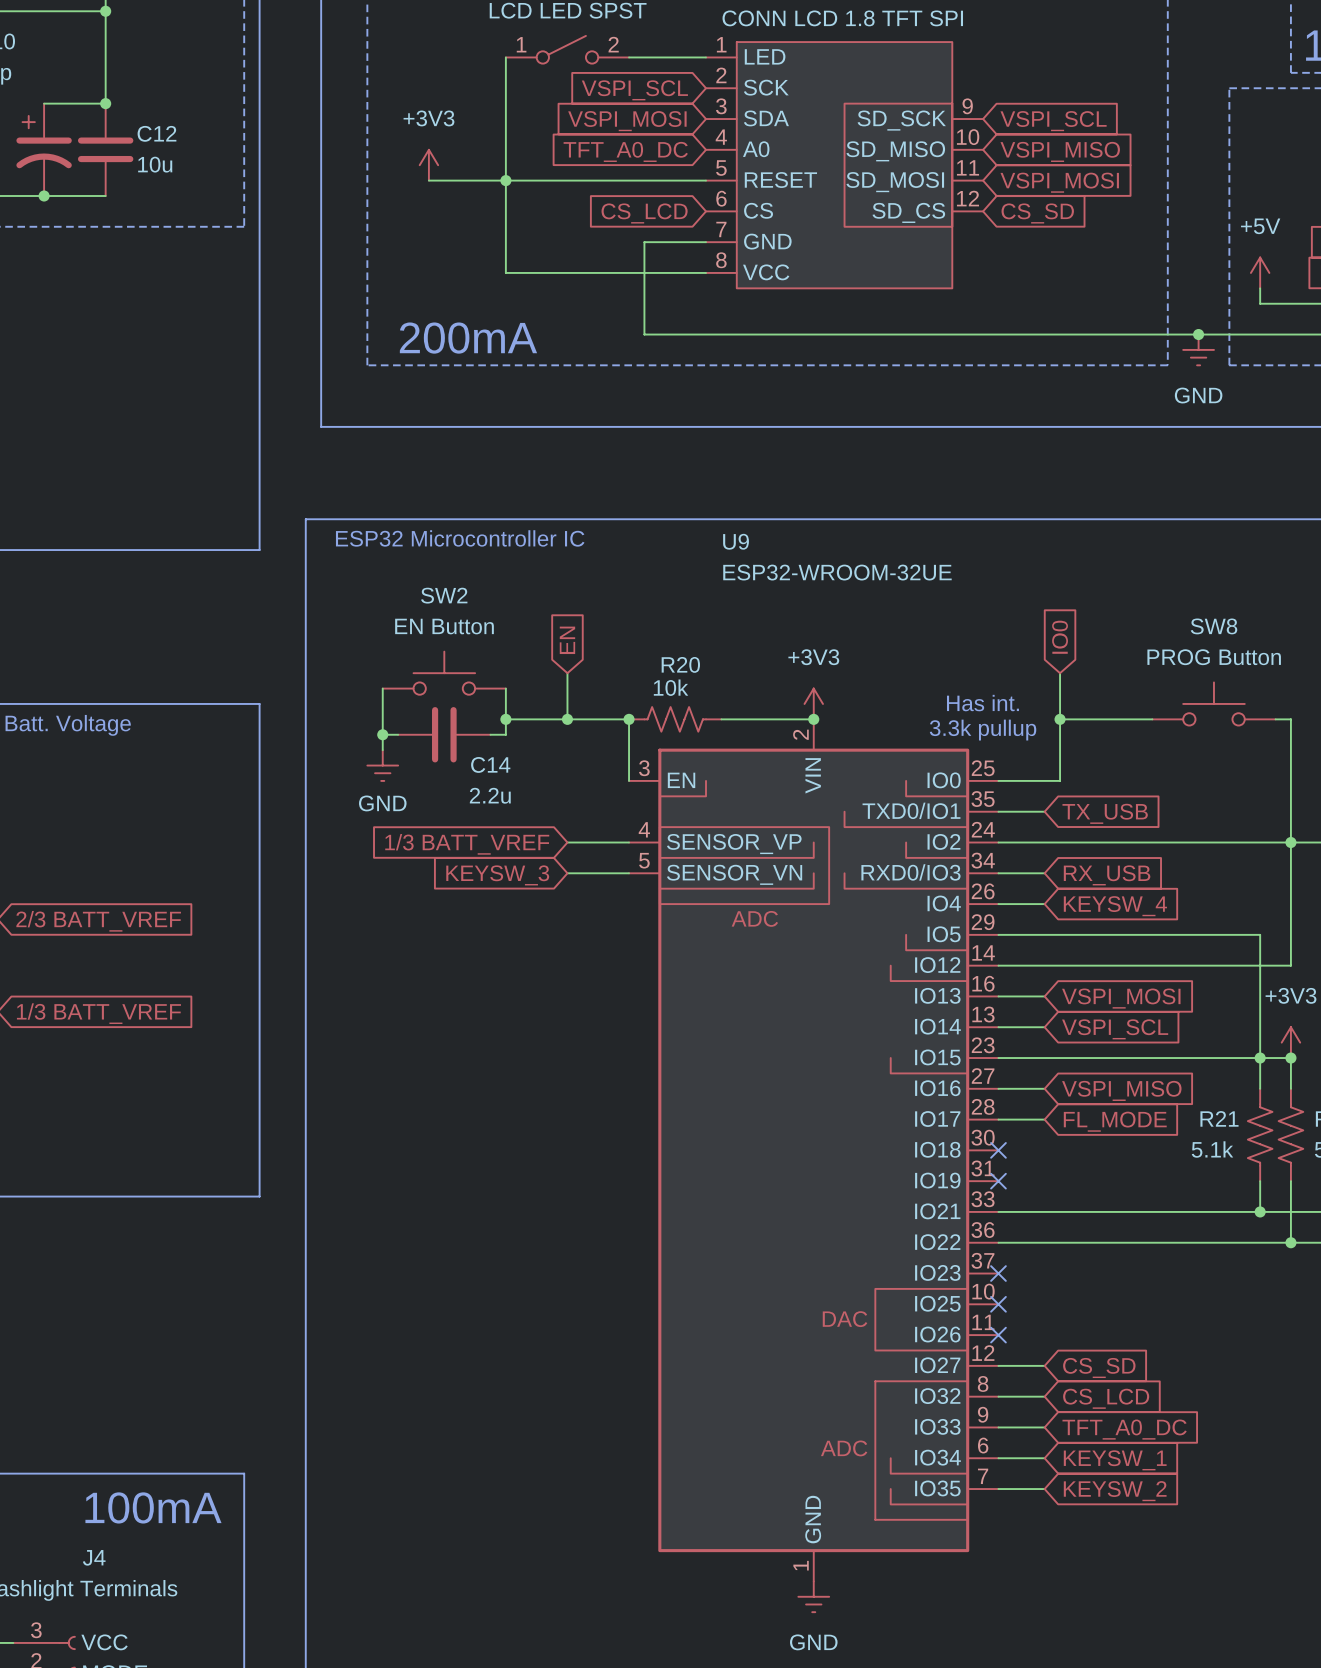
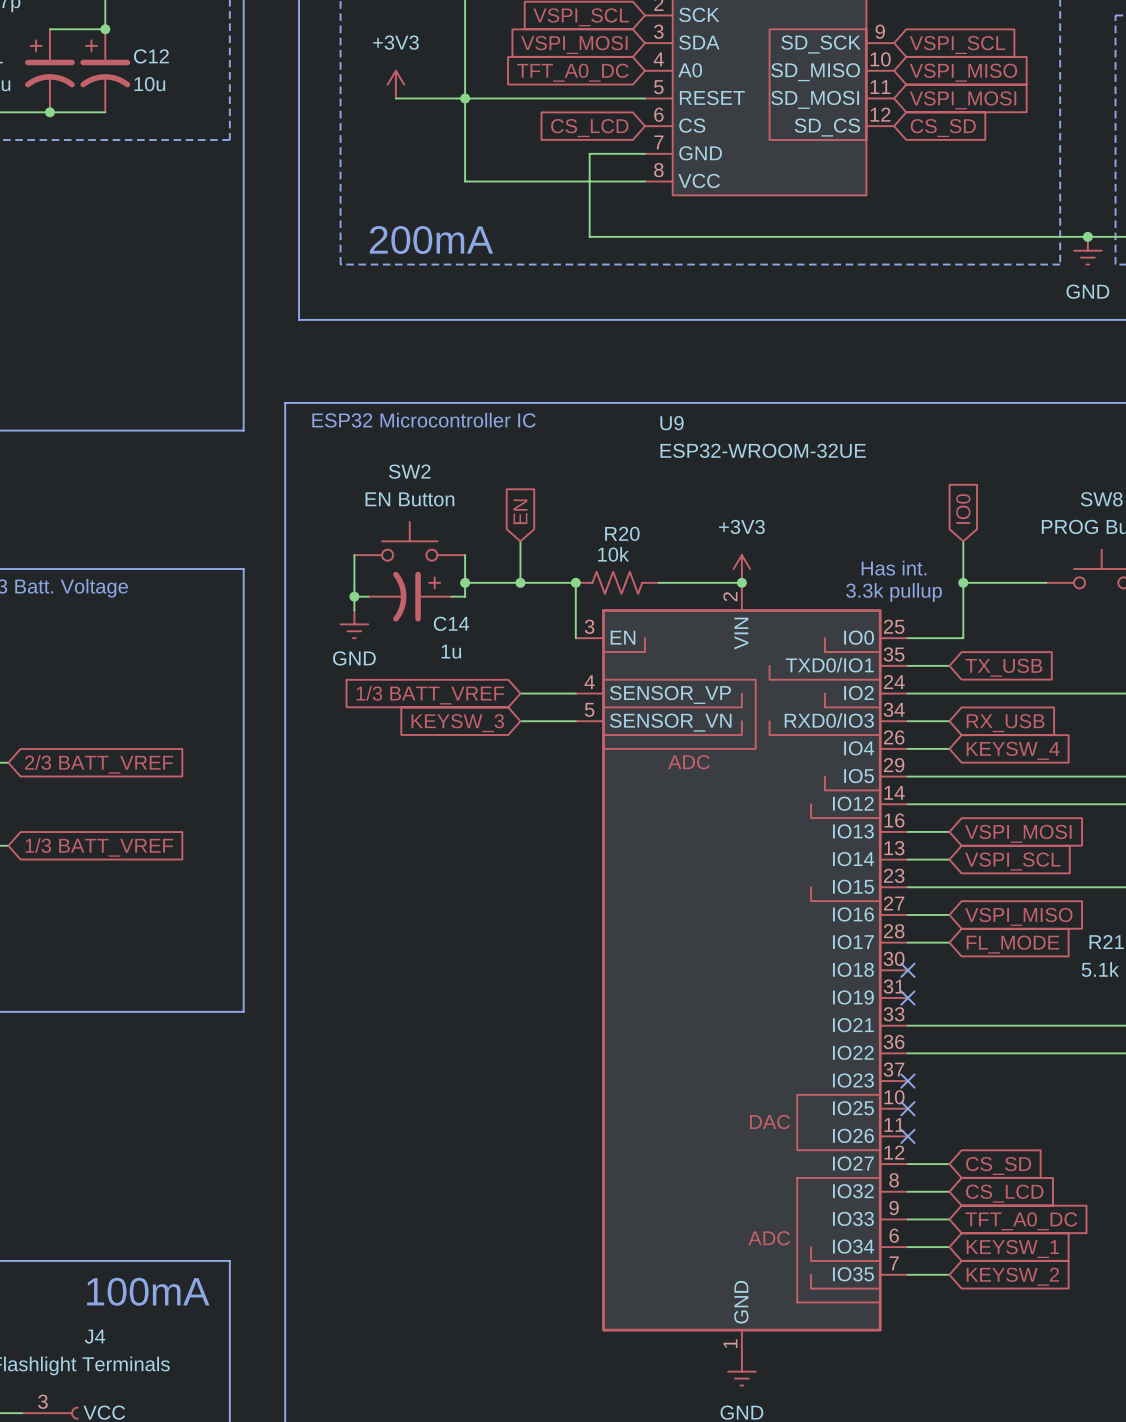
C12 symbol: [77, 103, 134, 196] -> [80, 29, 131, 113]
C14 symbol: [398, 707, 491, 763] -> [368, 571, 452, 622]
C14 value: 2.2u (490, 795) -> 1u (451, 651)

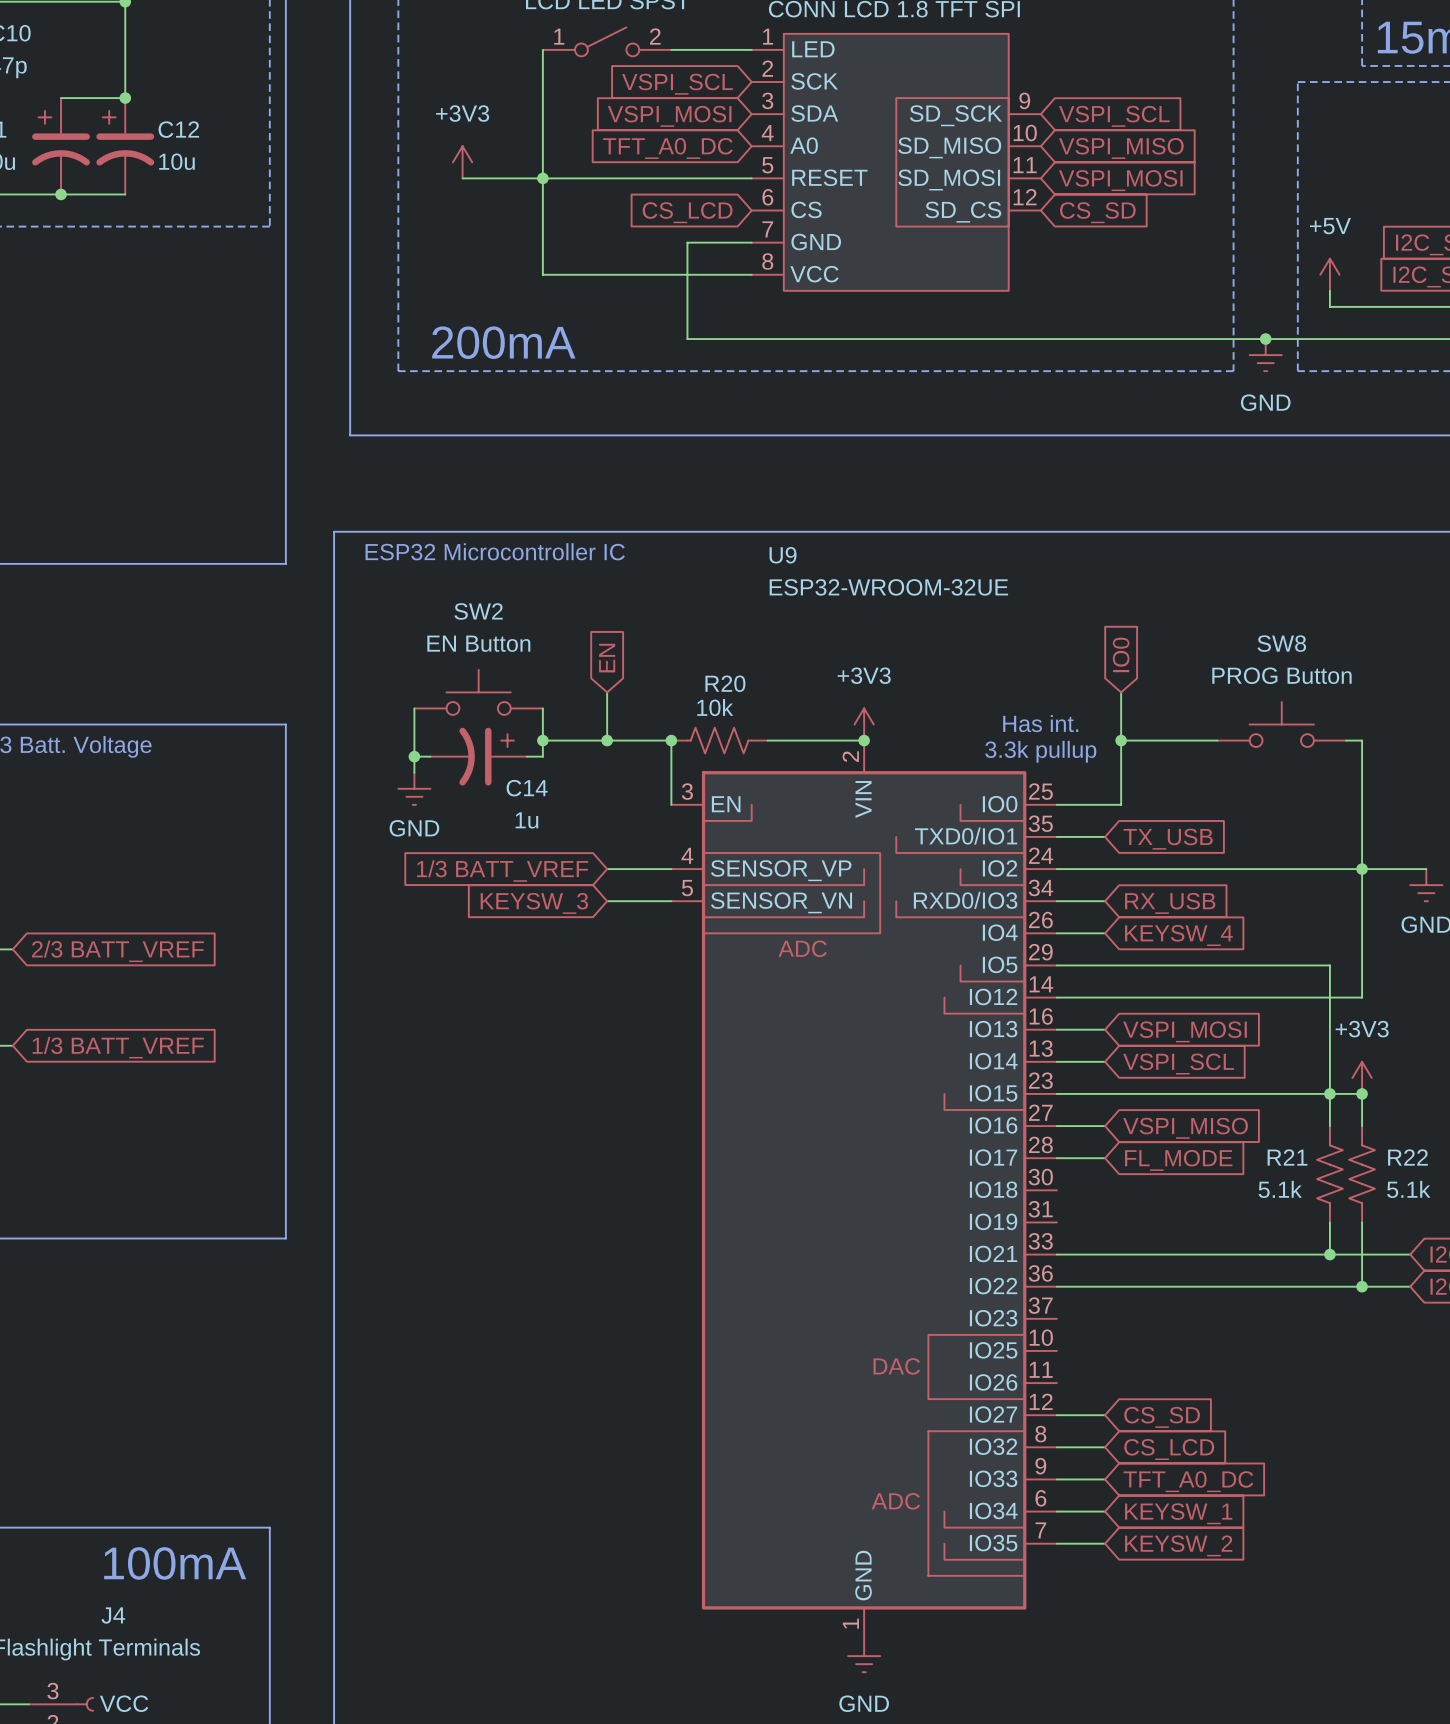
no-connect mark: (907, 970) -> none
no-connect mark: (907, 998) -> none
no-connect mark: (907, 1081) -> none
no-connect mark: (907, 1108) -> none
no-connect mark: (907, 1136) -> none

